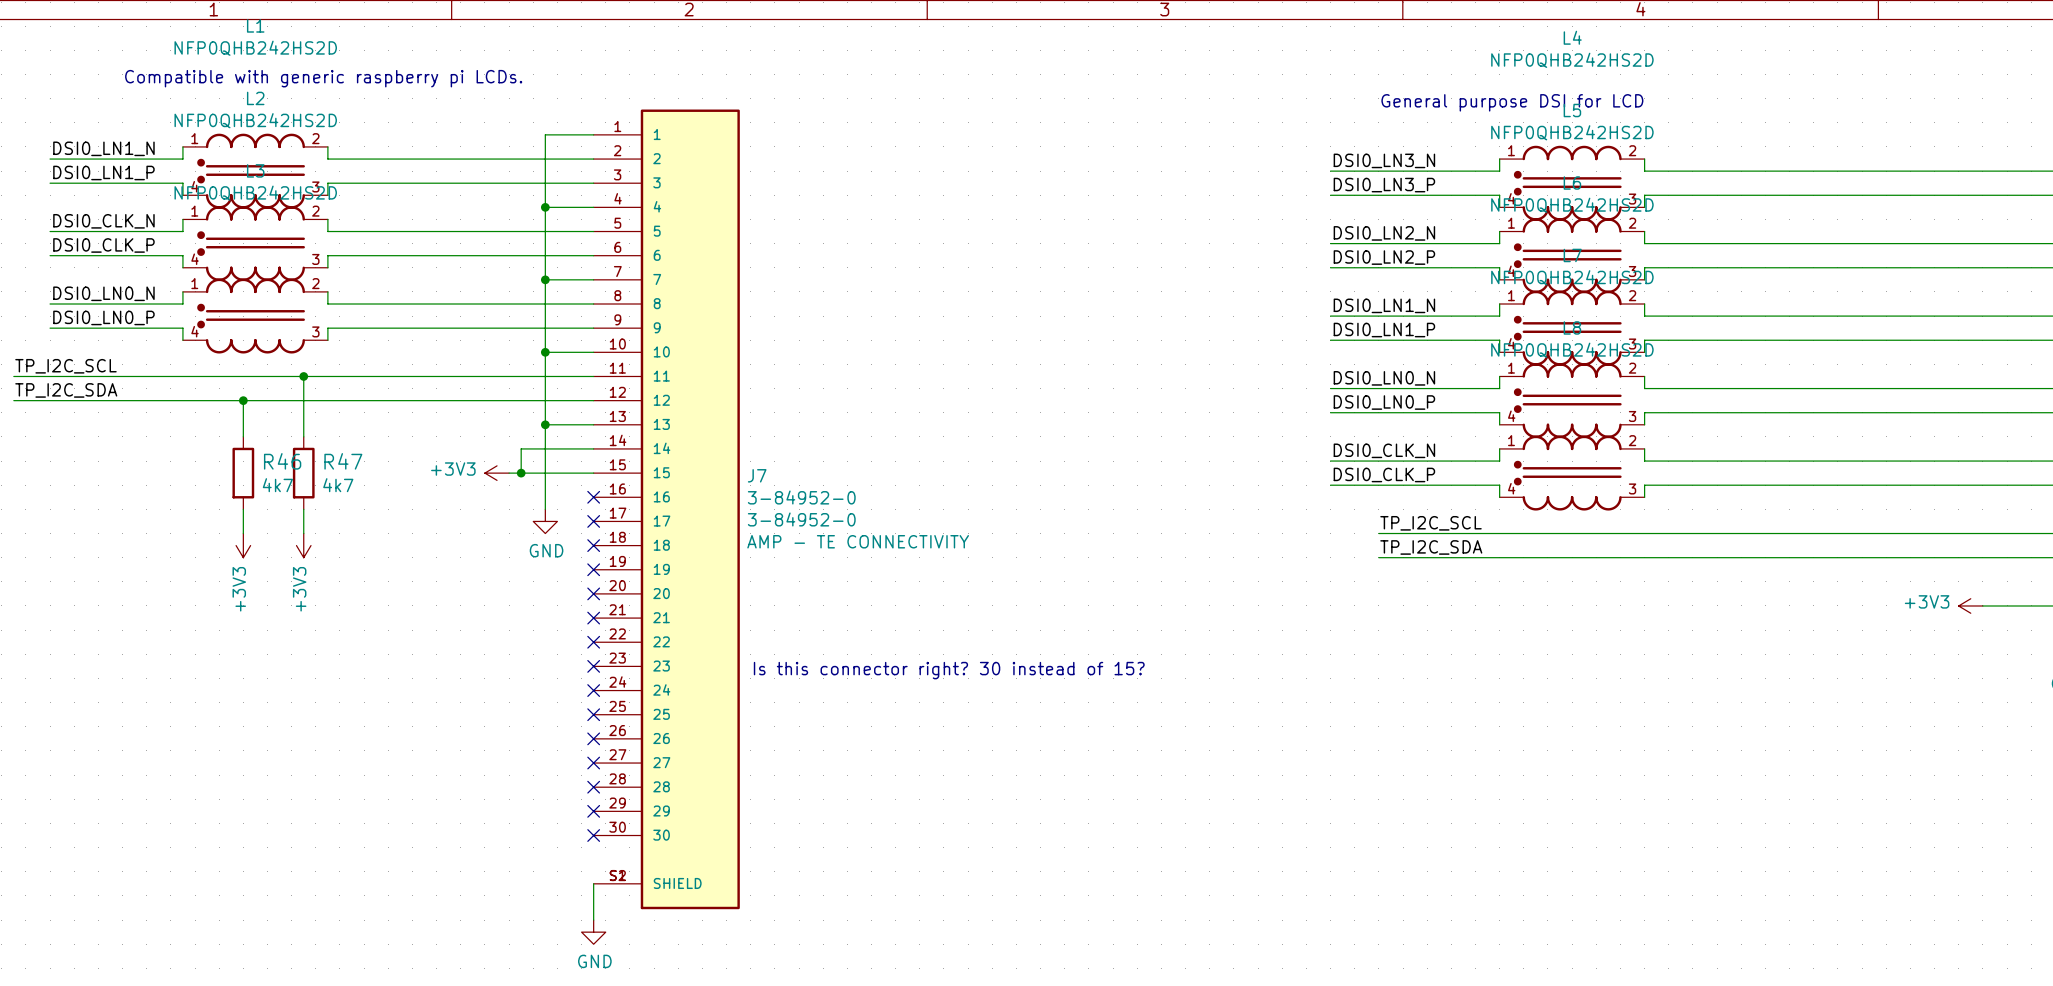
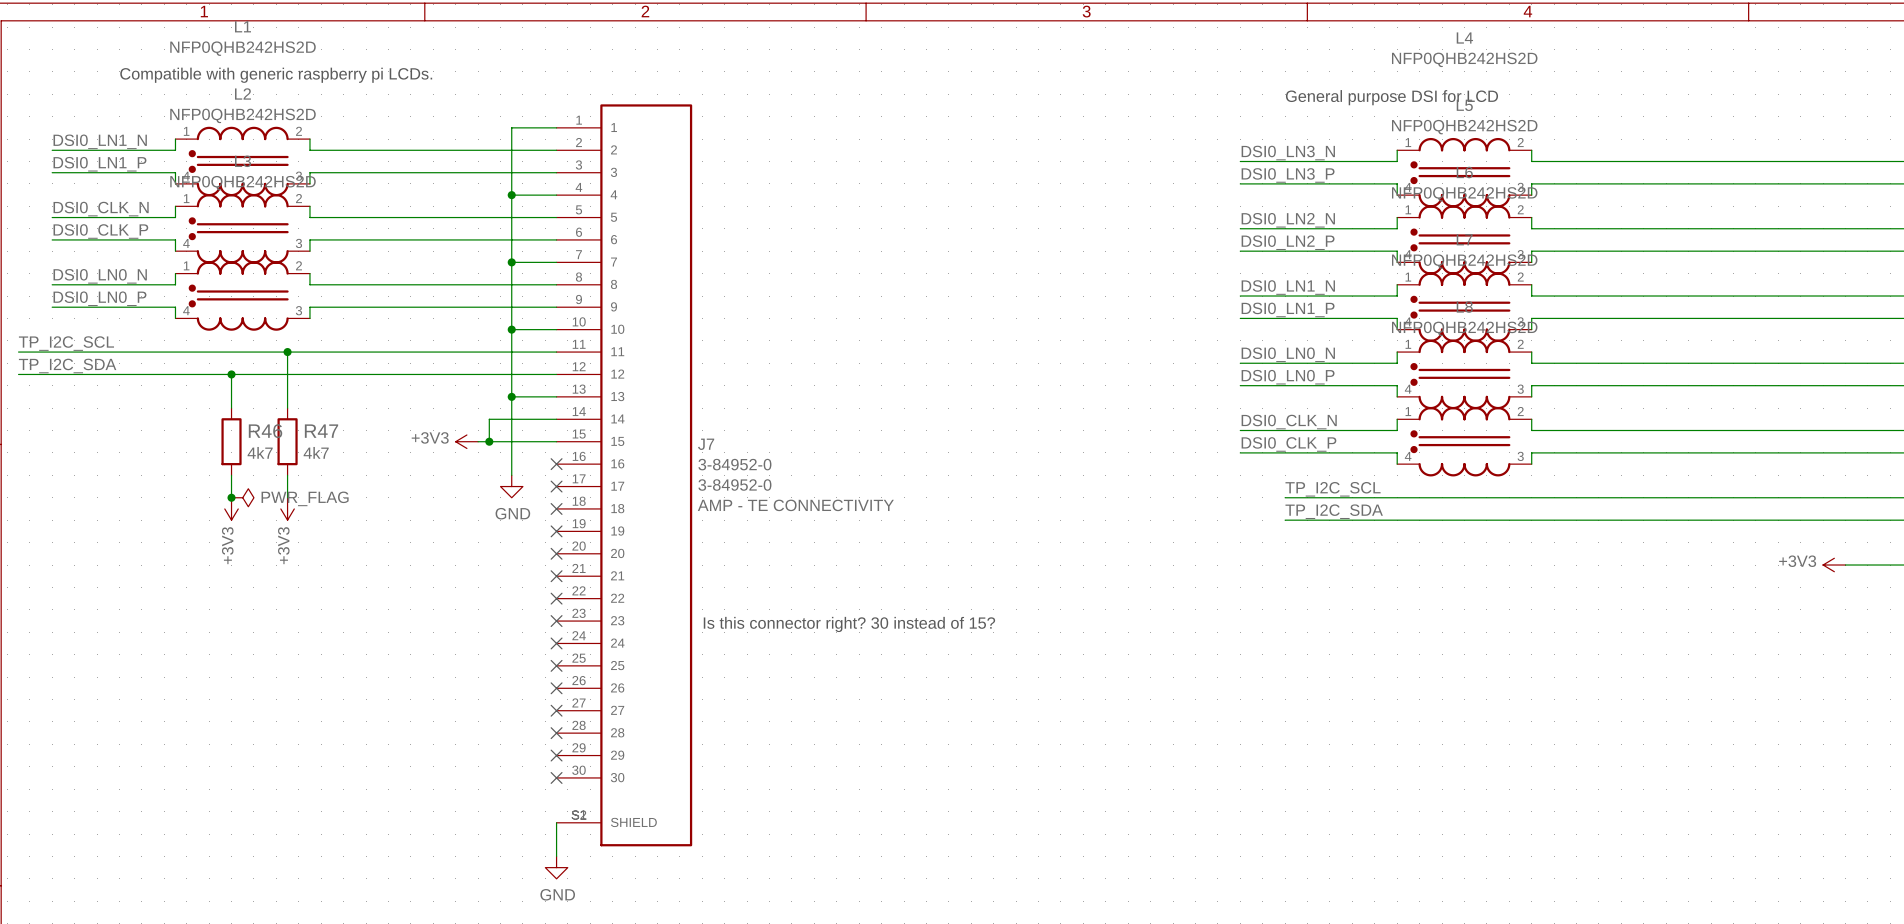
junction: none -> (231, 497)
power symbol: none -> PWR_FLAG (242, 497)

